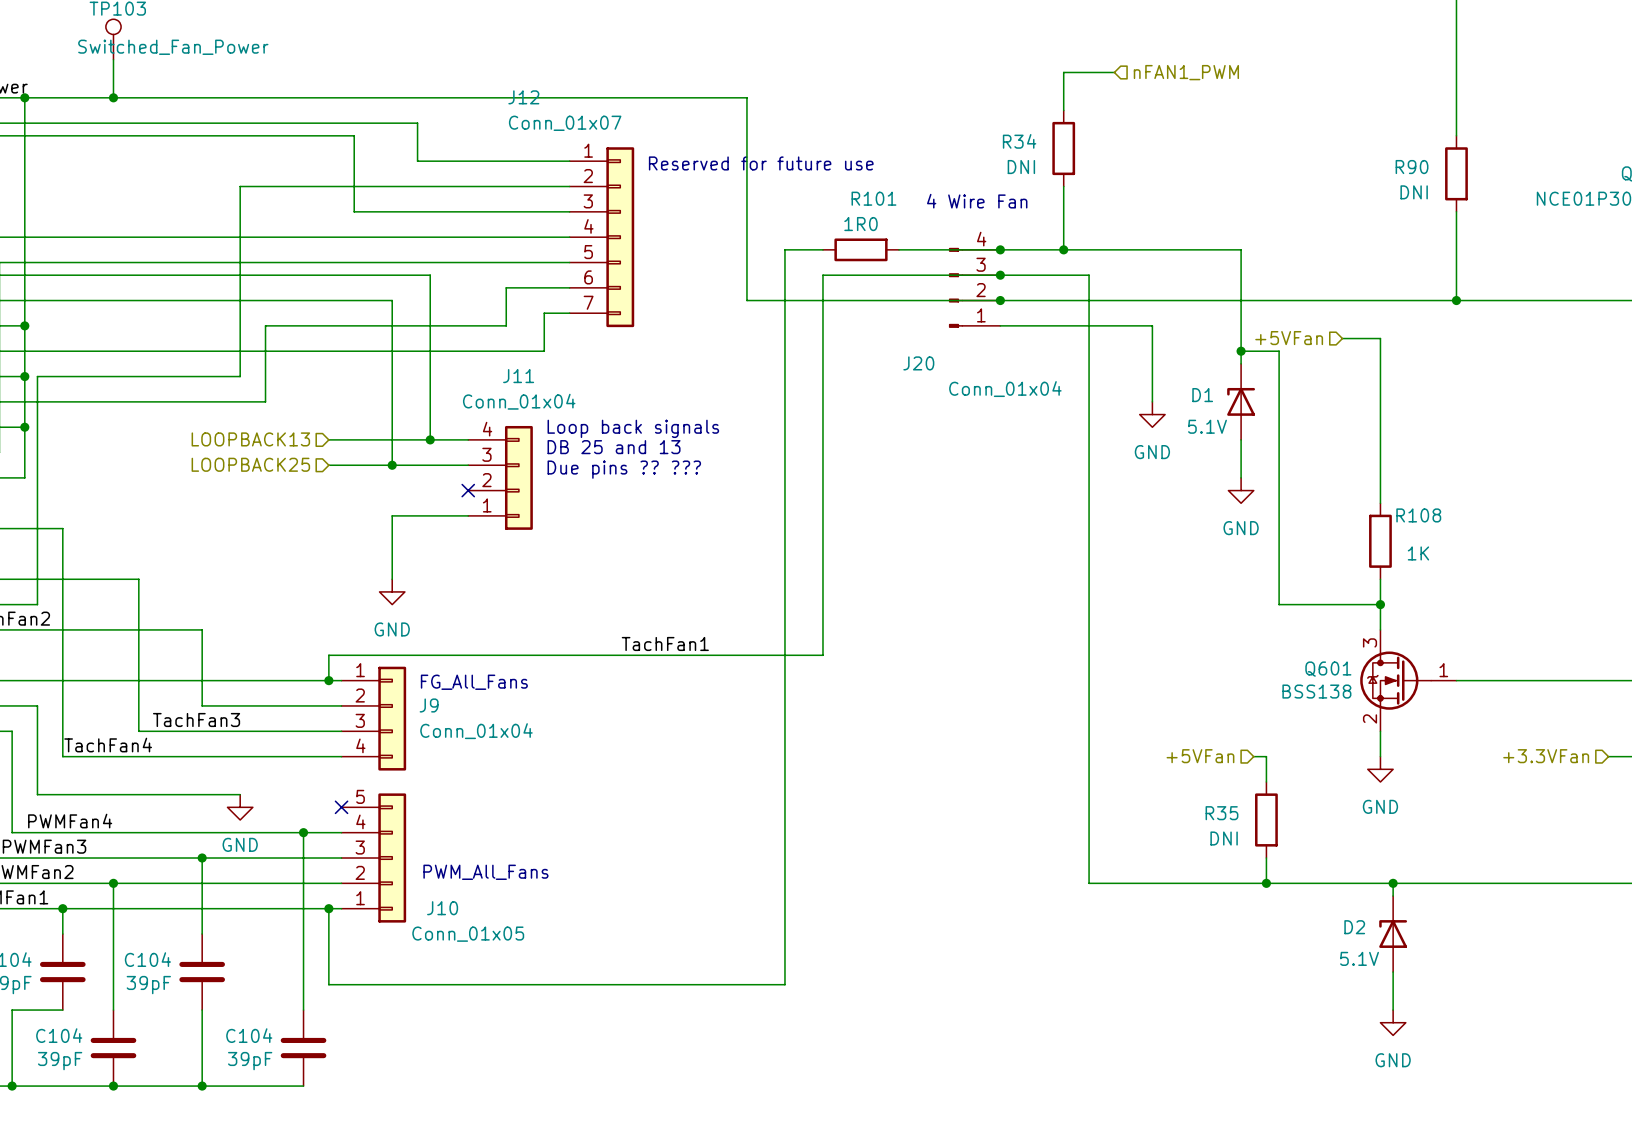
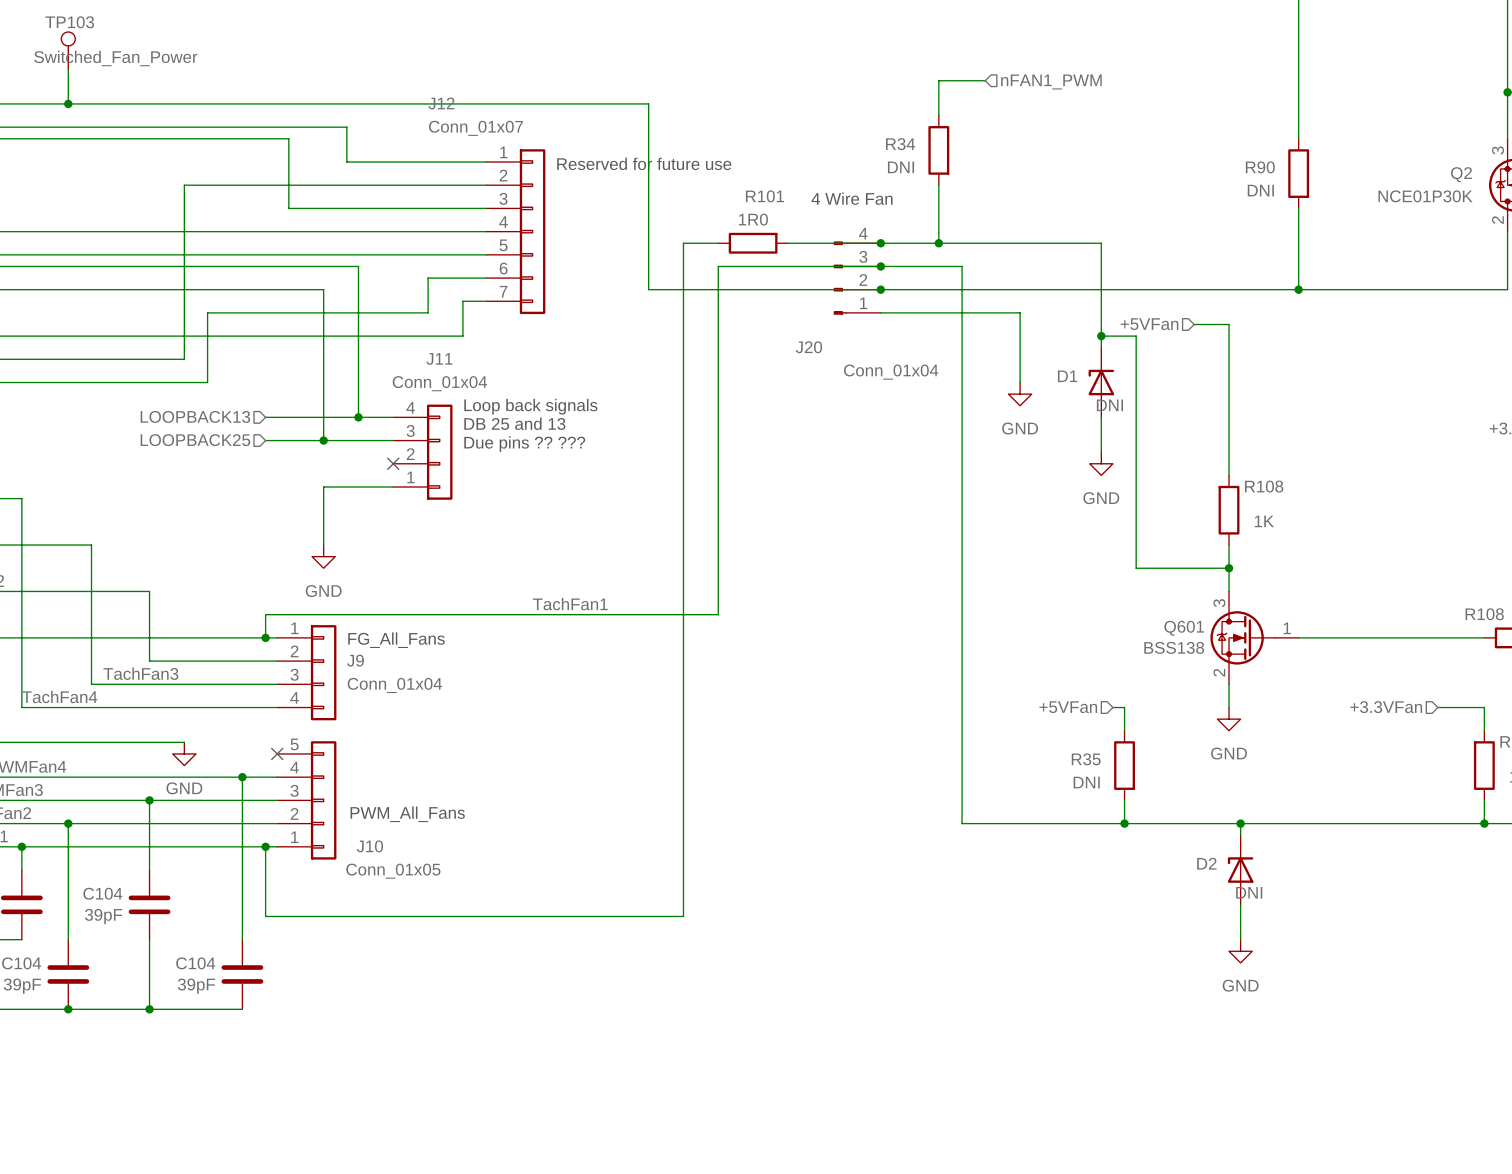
D1 value: 5.1V (1207, 426) -> DNI (1109, 405)
D2 value: 5.1V (1359, 958) -> DNI (1249, 892)

